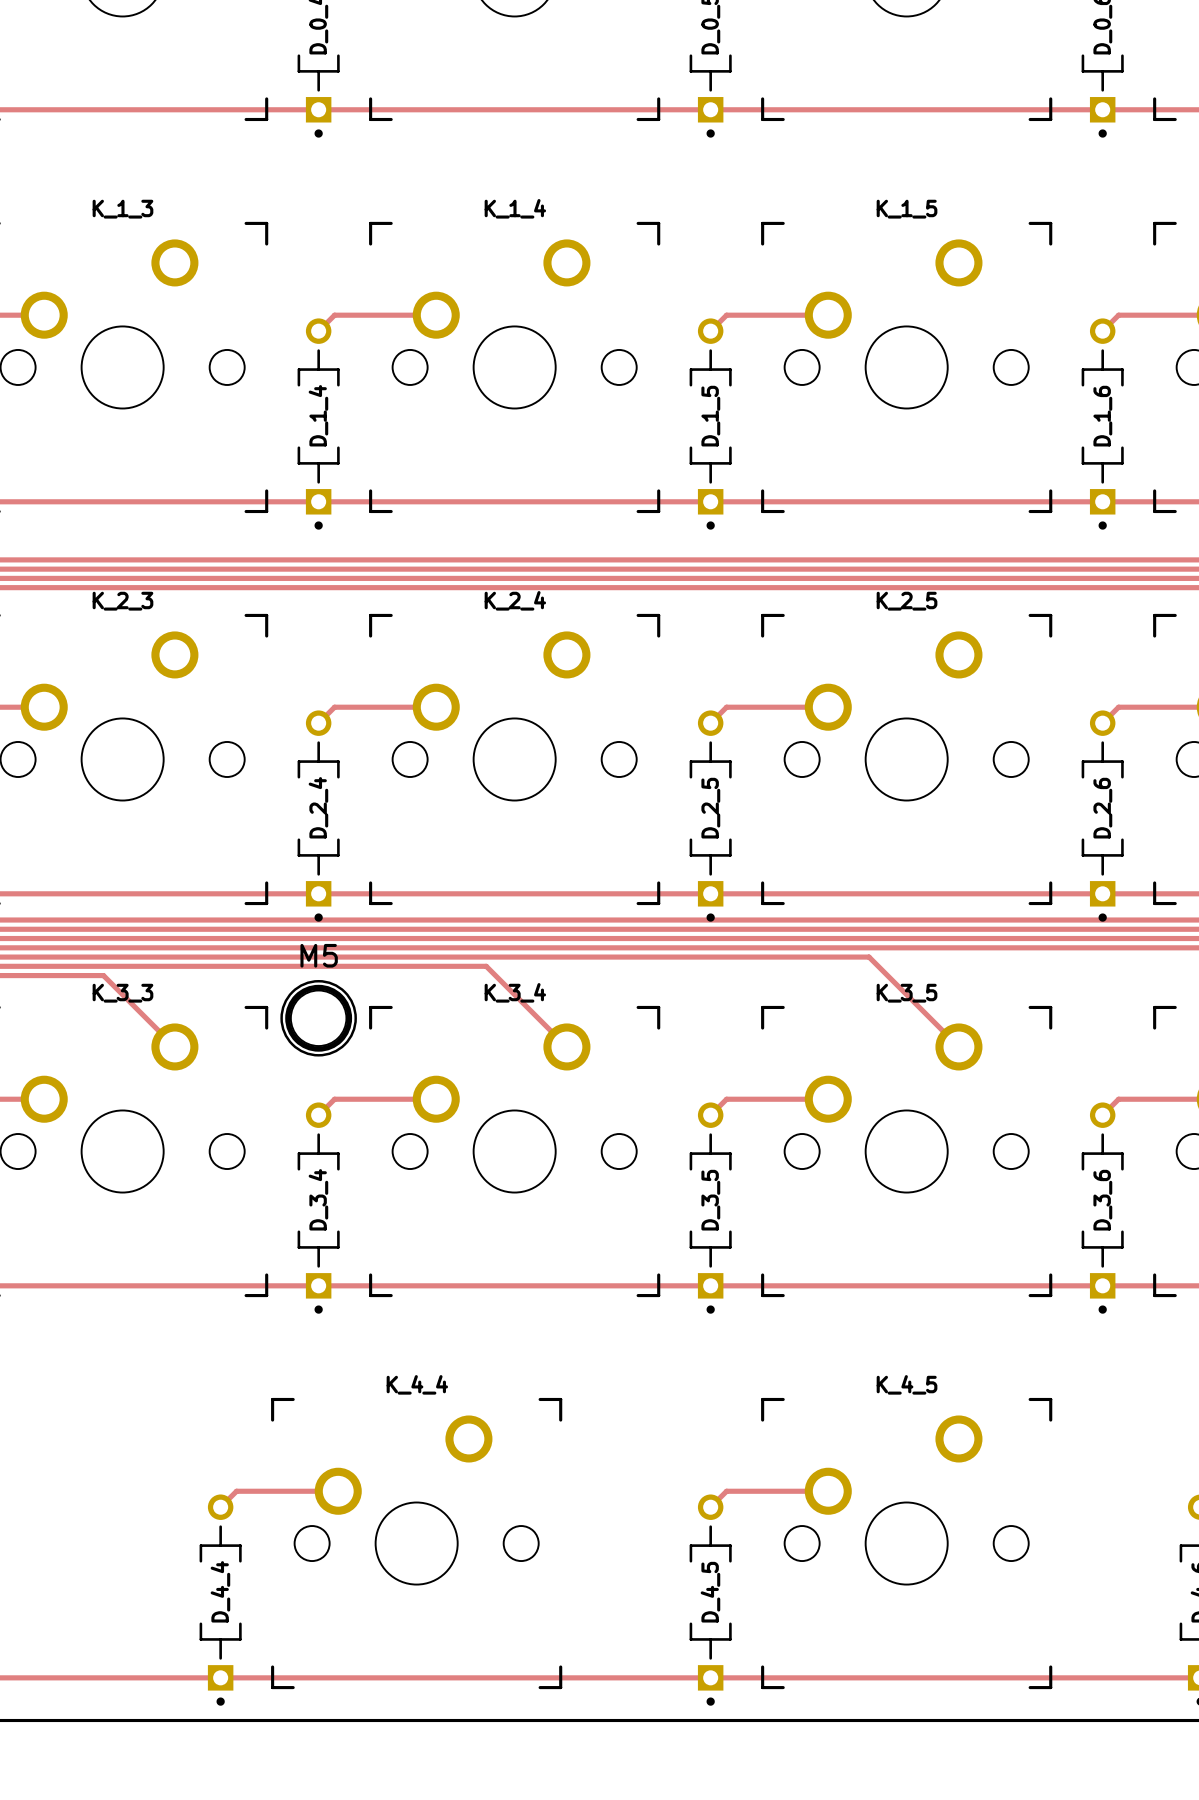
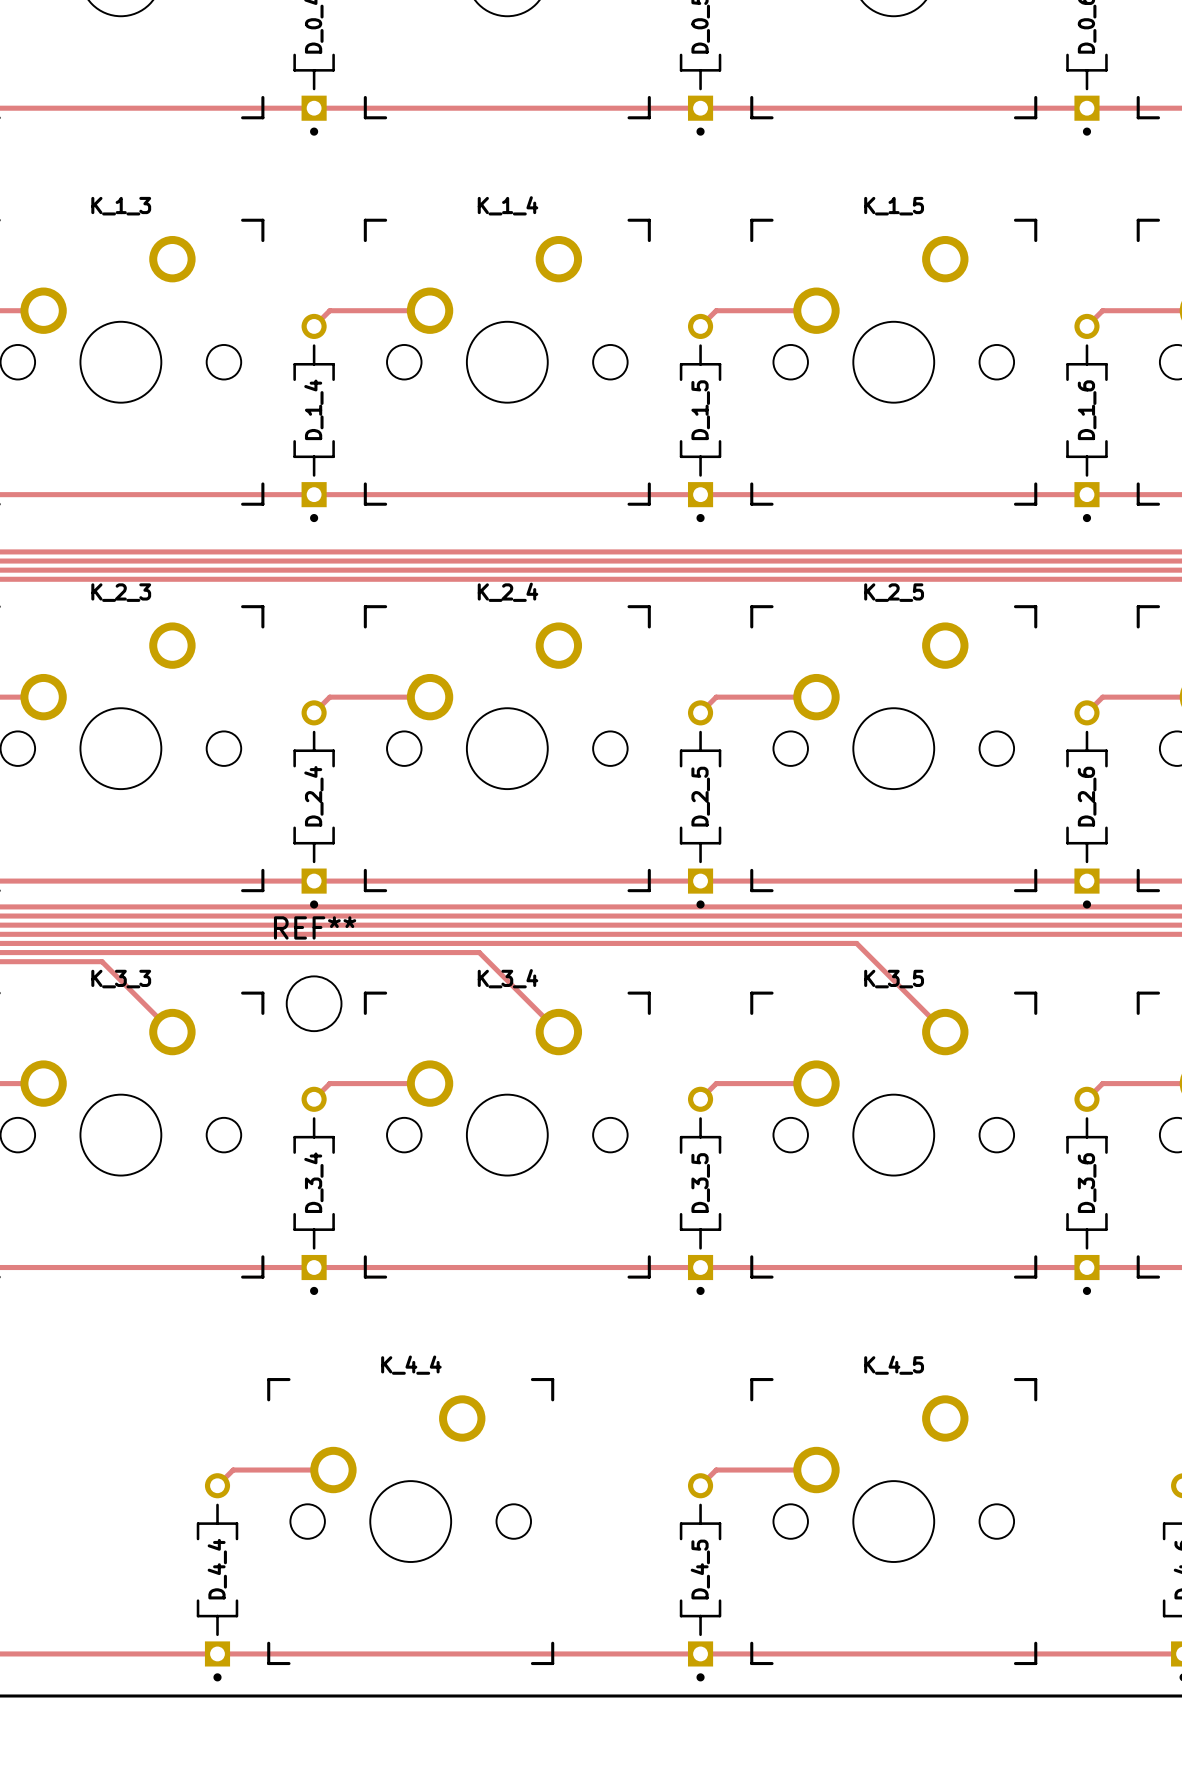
M5 name: M5 (319, 955) -> REF** (315, 927)
drawing: [280, 979, 357, 1057] -> none

